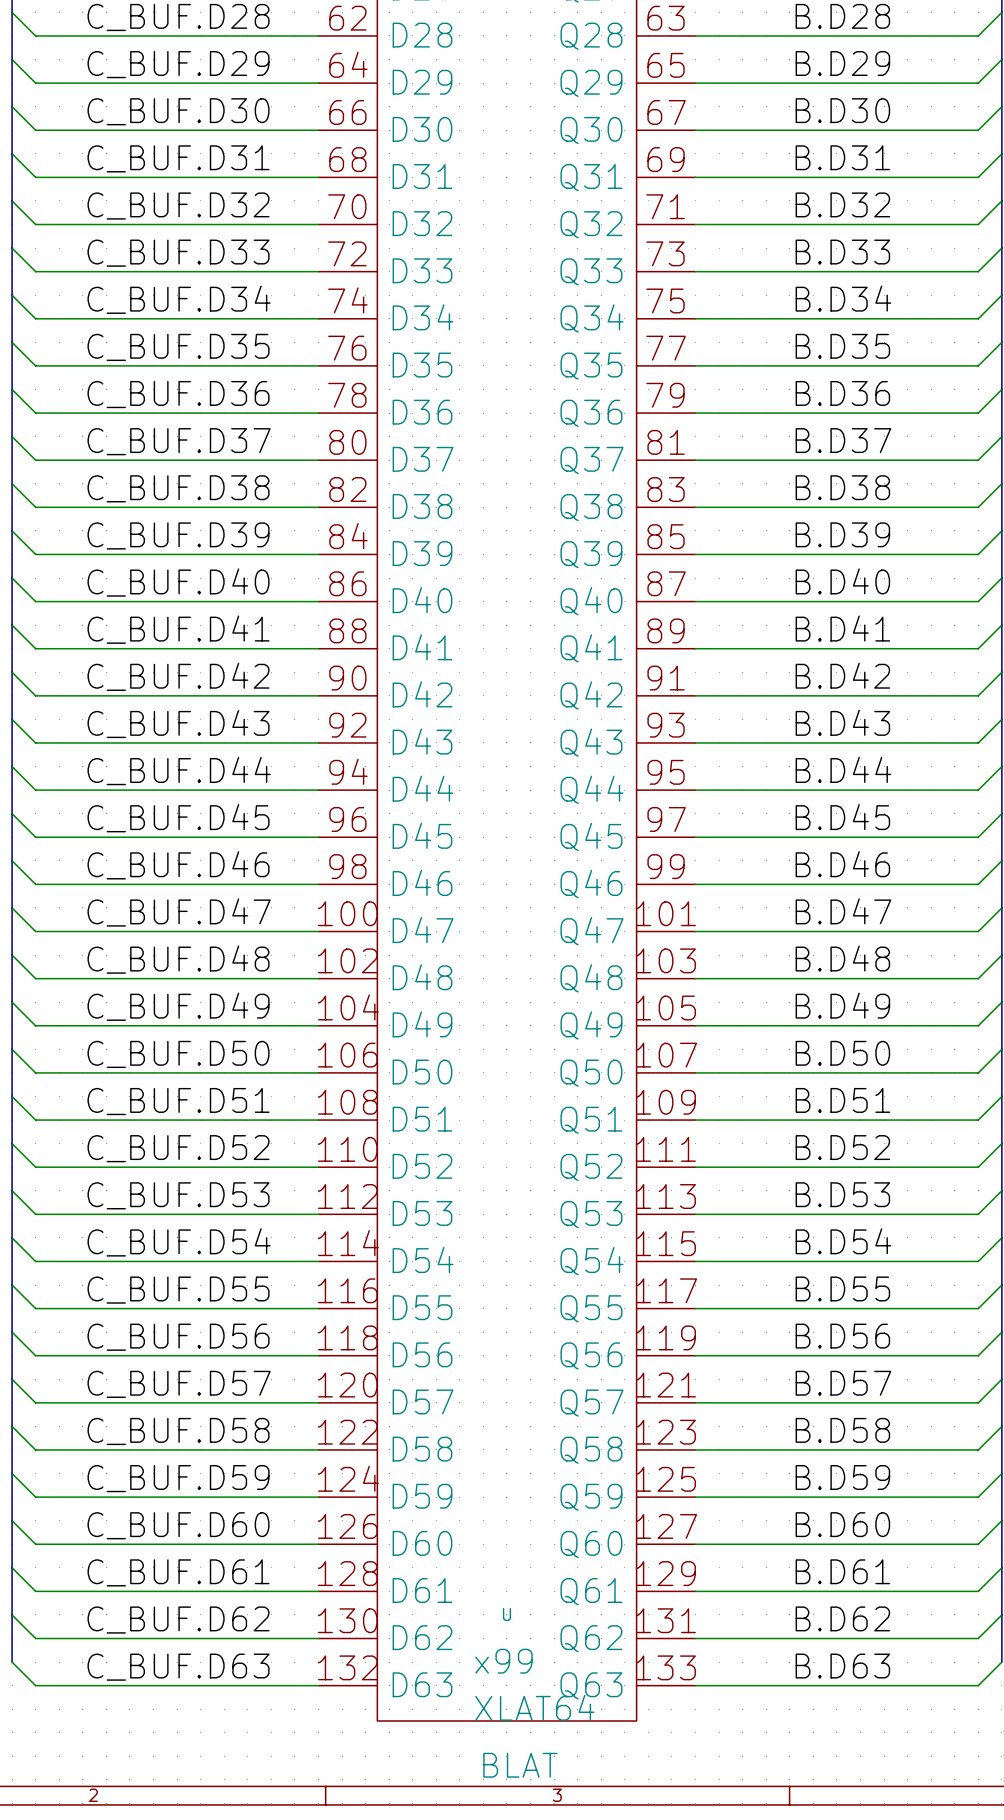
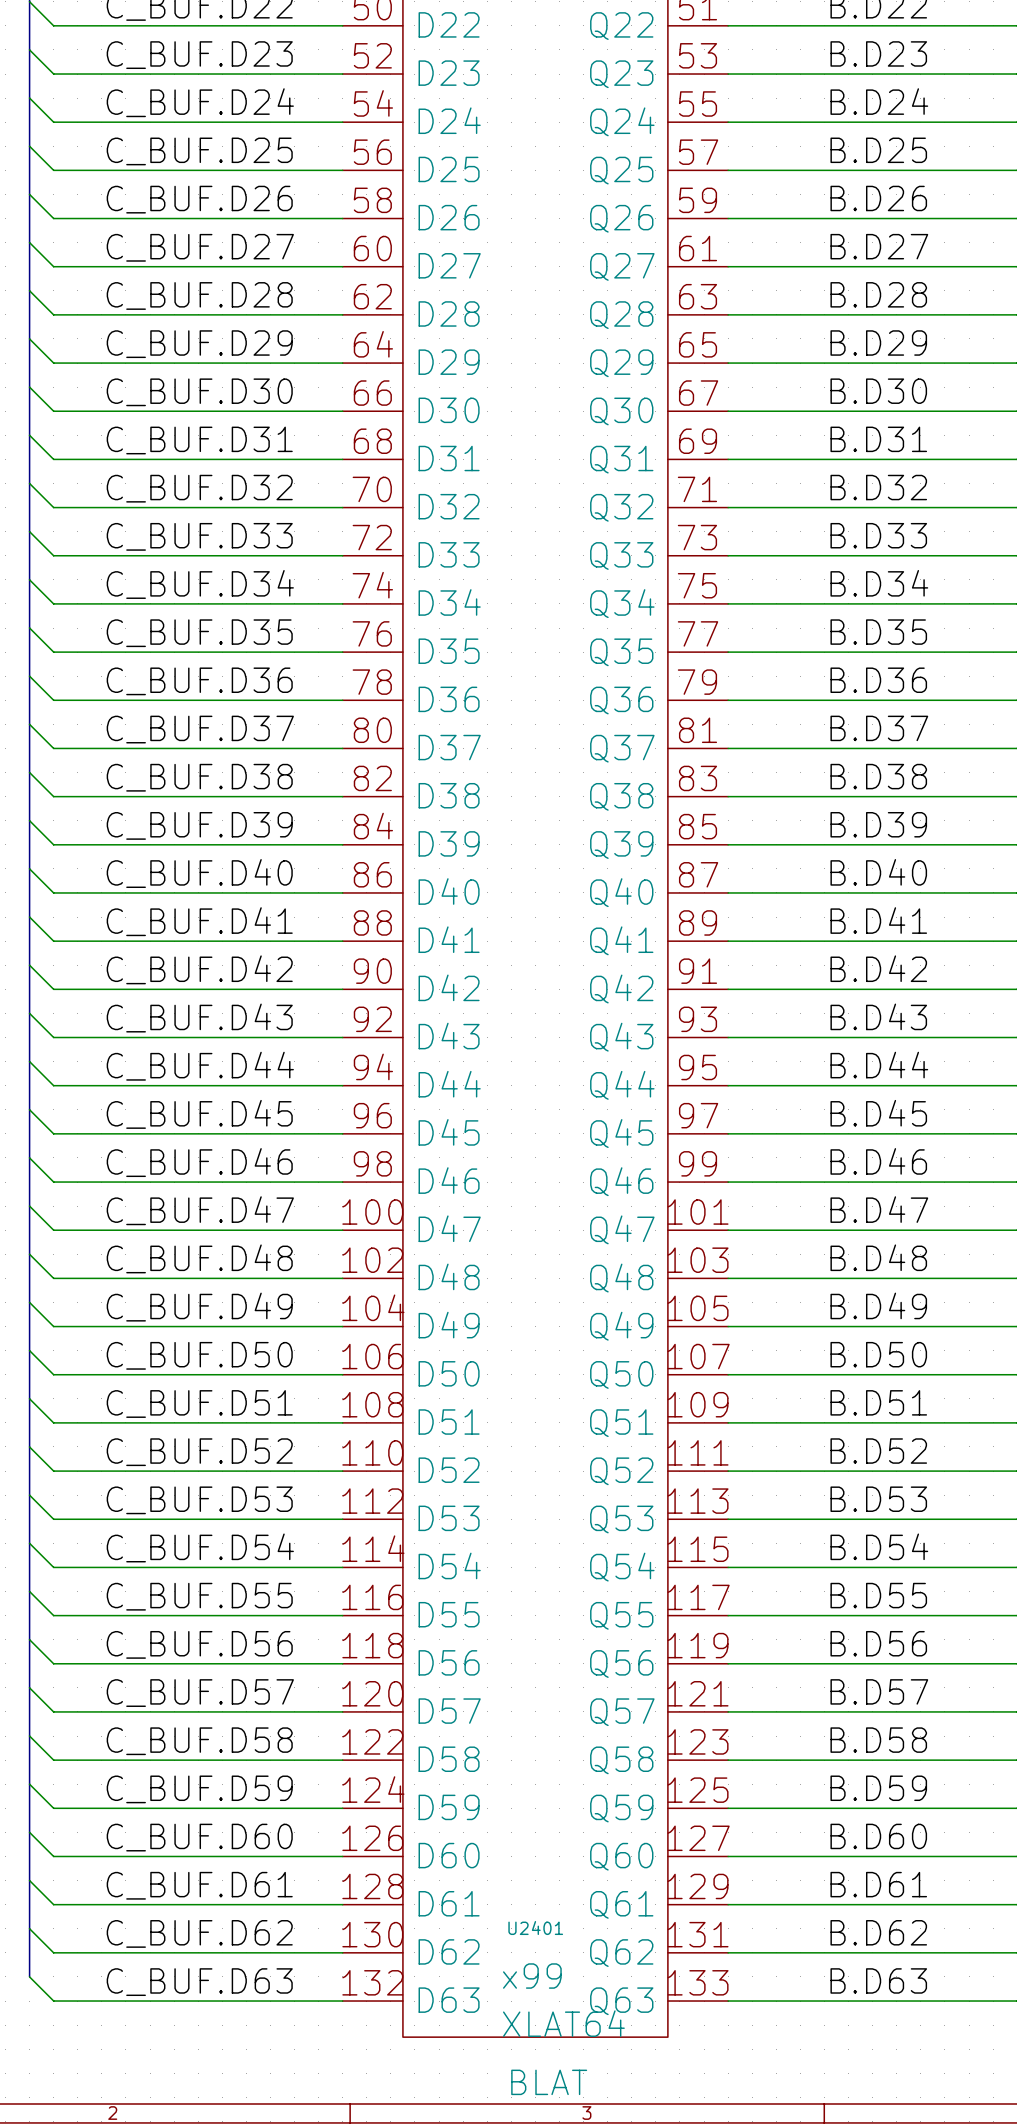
U name: U (506, 1614) -> U2401 (535, 1928)

